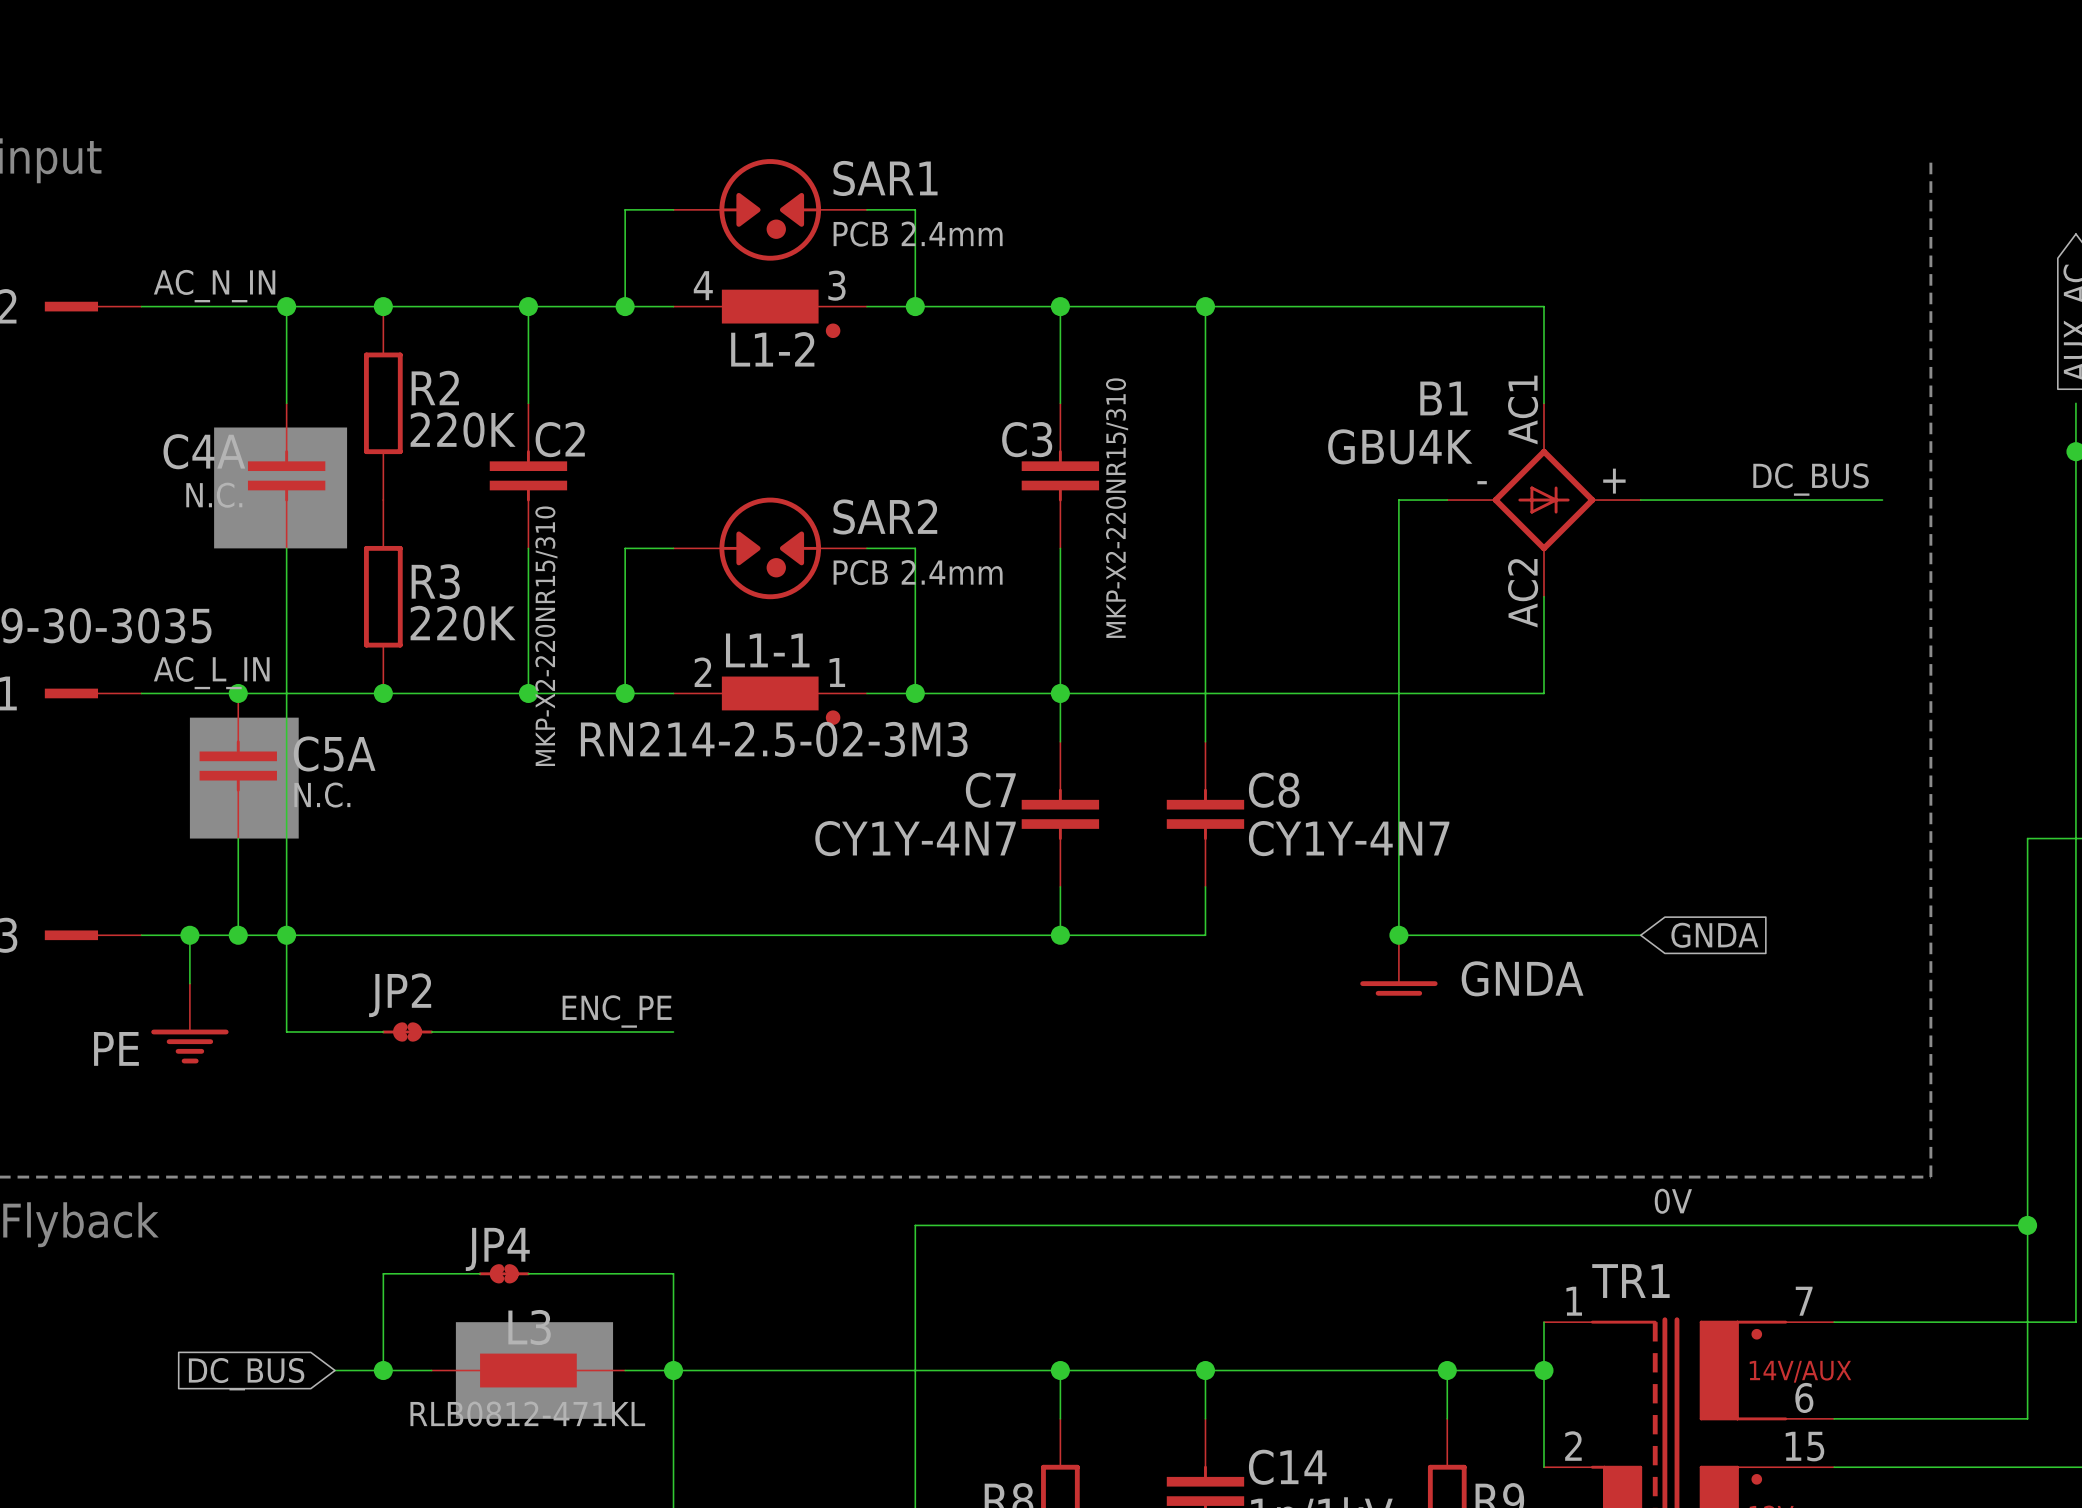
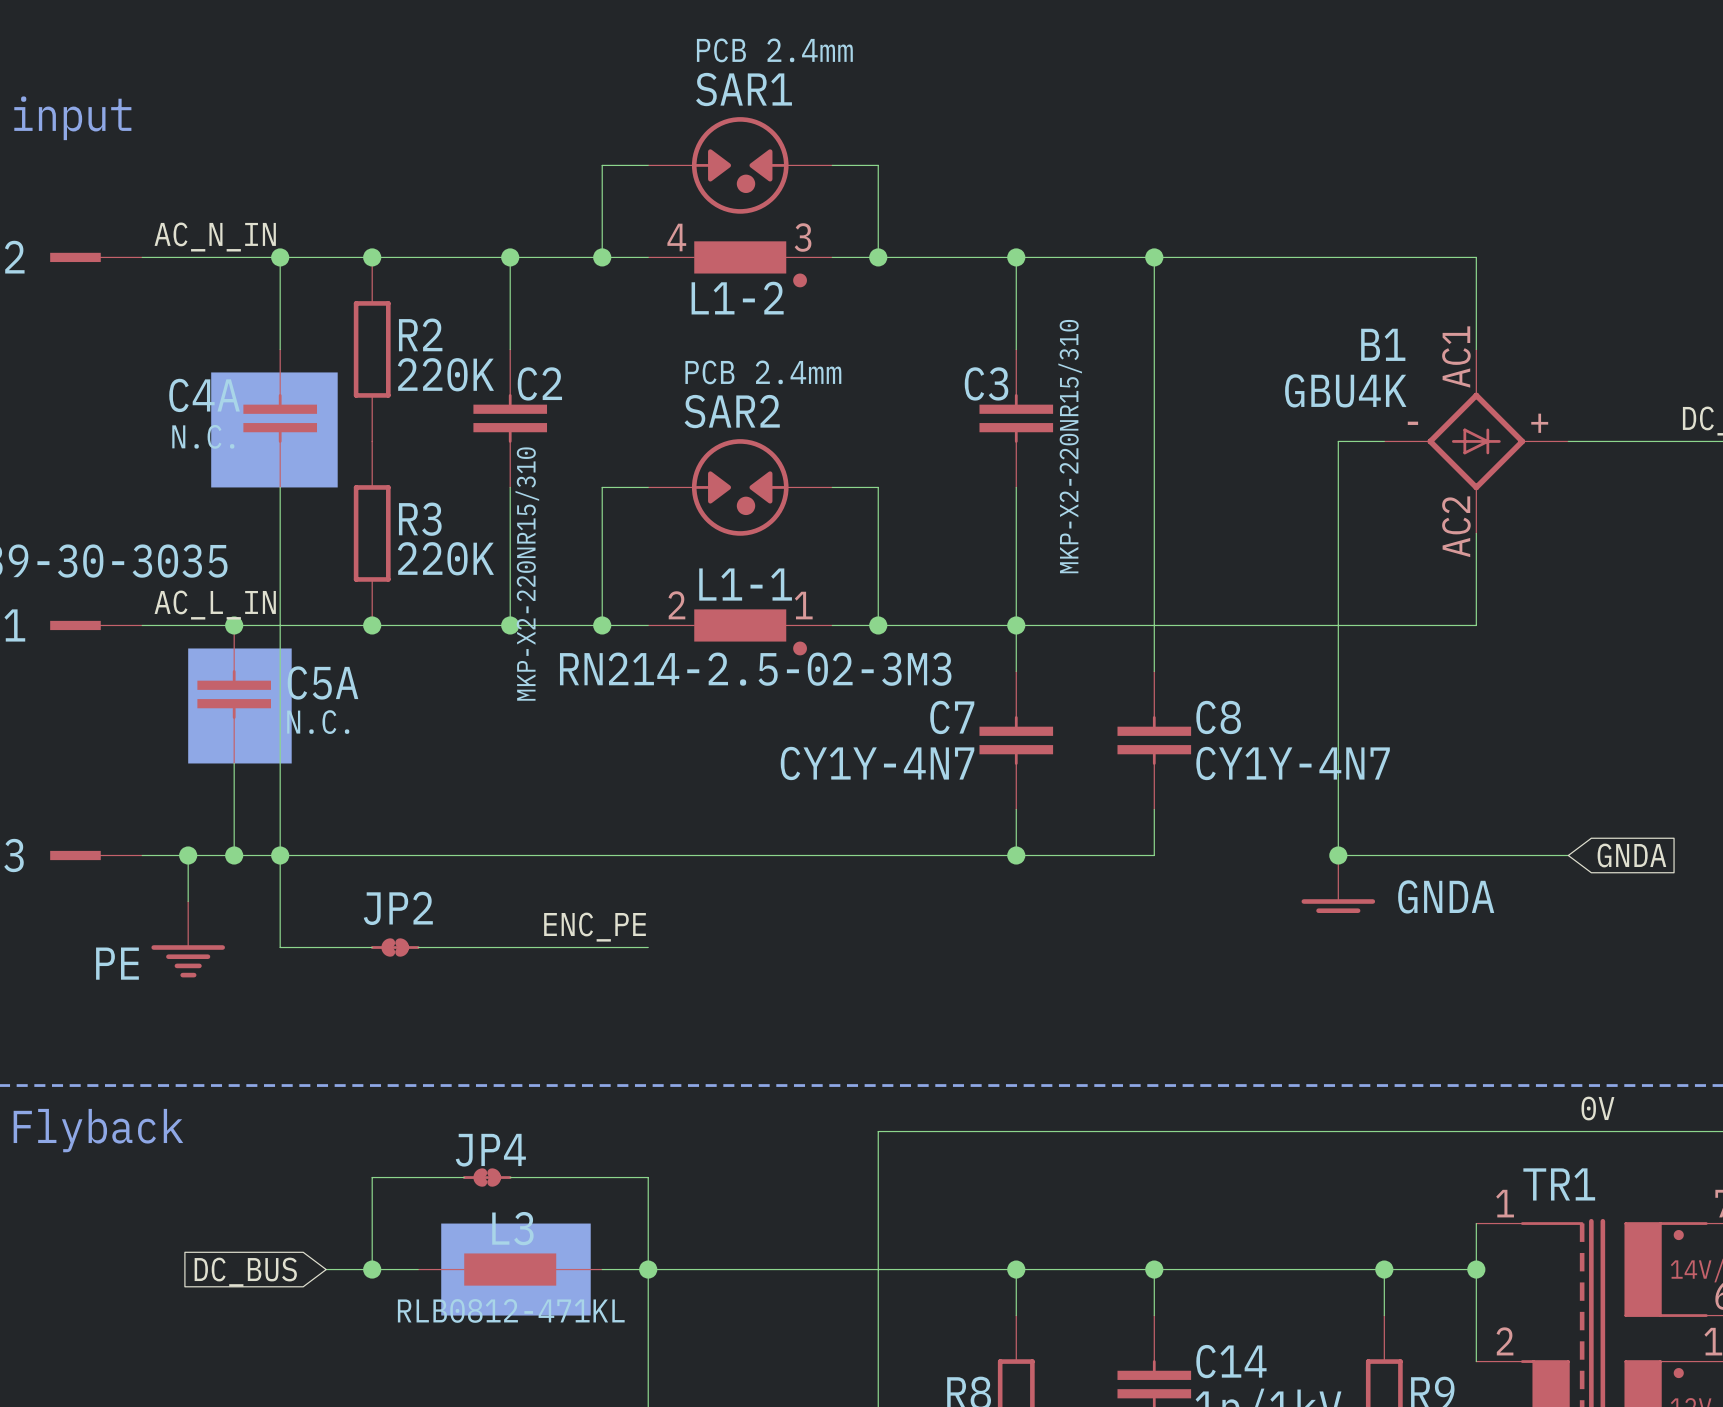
SAR1 name position: SAR1 (885, 178) -> SAR1 (744, 89)
SAR1 value position: PCB 2.4mm (918, 234) -> PCB 2.4mm (774, 50)
SAR2 name position: SAR2 (885, 516) -> SAR2 (732, 411)
SAR2 value position: PCB 2.4mm (918, 572) -> PCB 2.4mm (763, 372)

